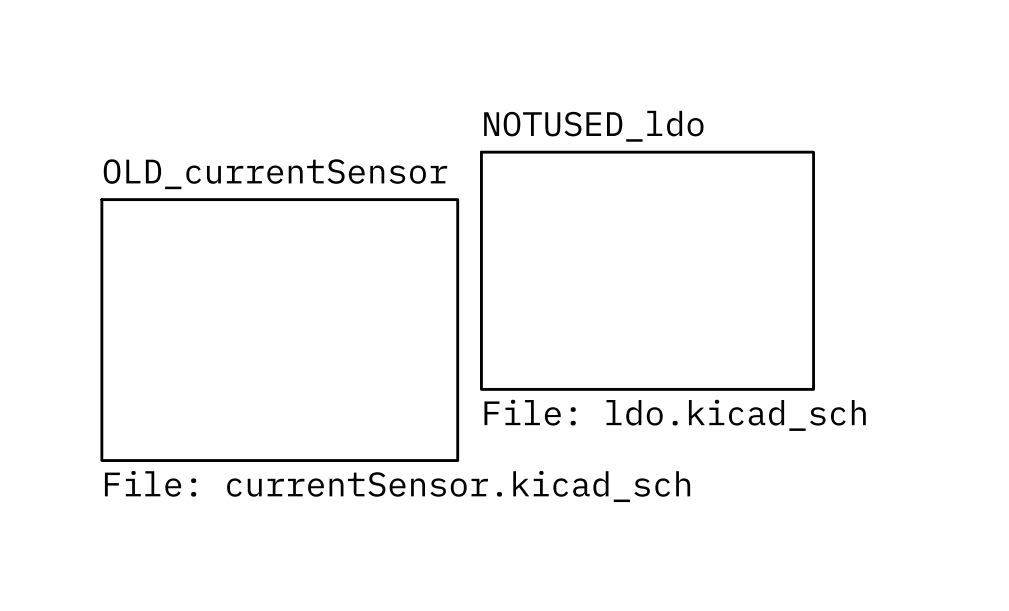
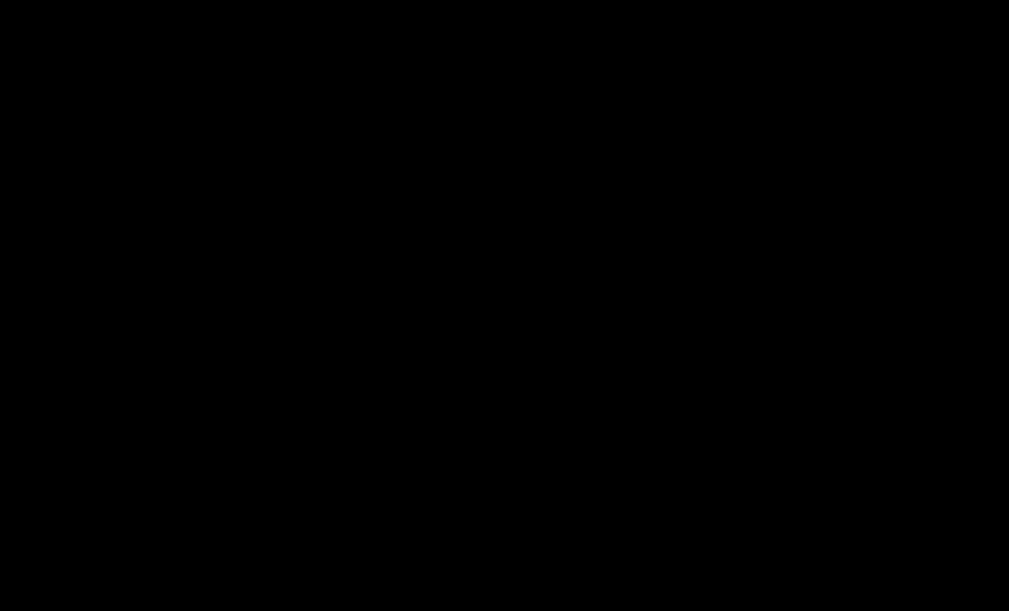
sheet NOTUSED_ldo: File: ldo.kicad_sch (647, 270) -> none
sheet OLD_currentSensor: File: currentSensor.kicad_sch (279, 330) -> none

